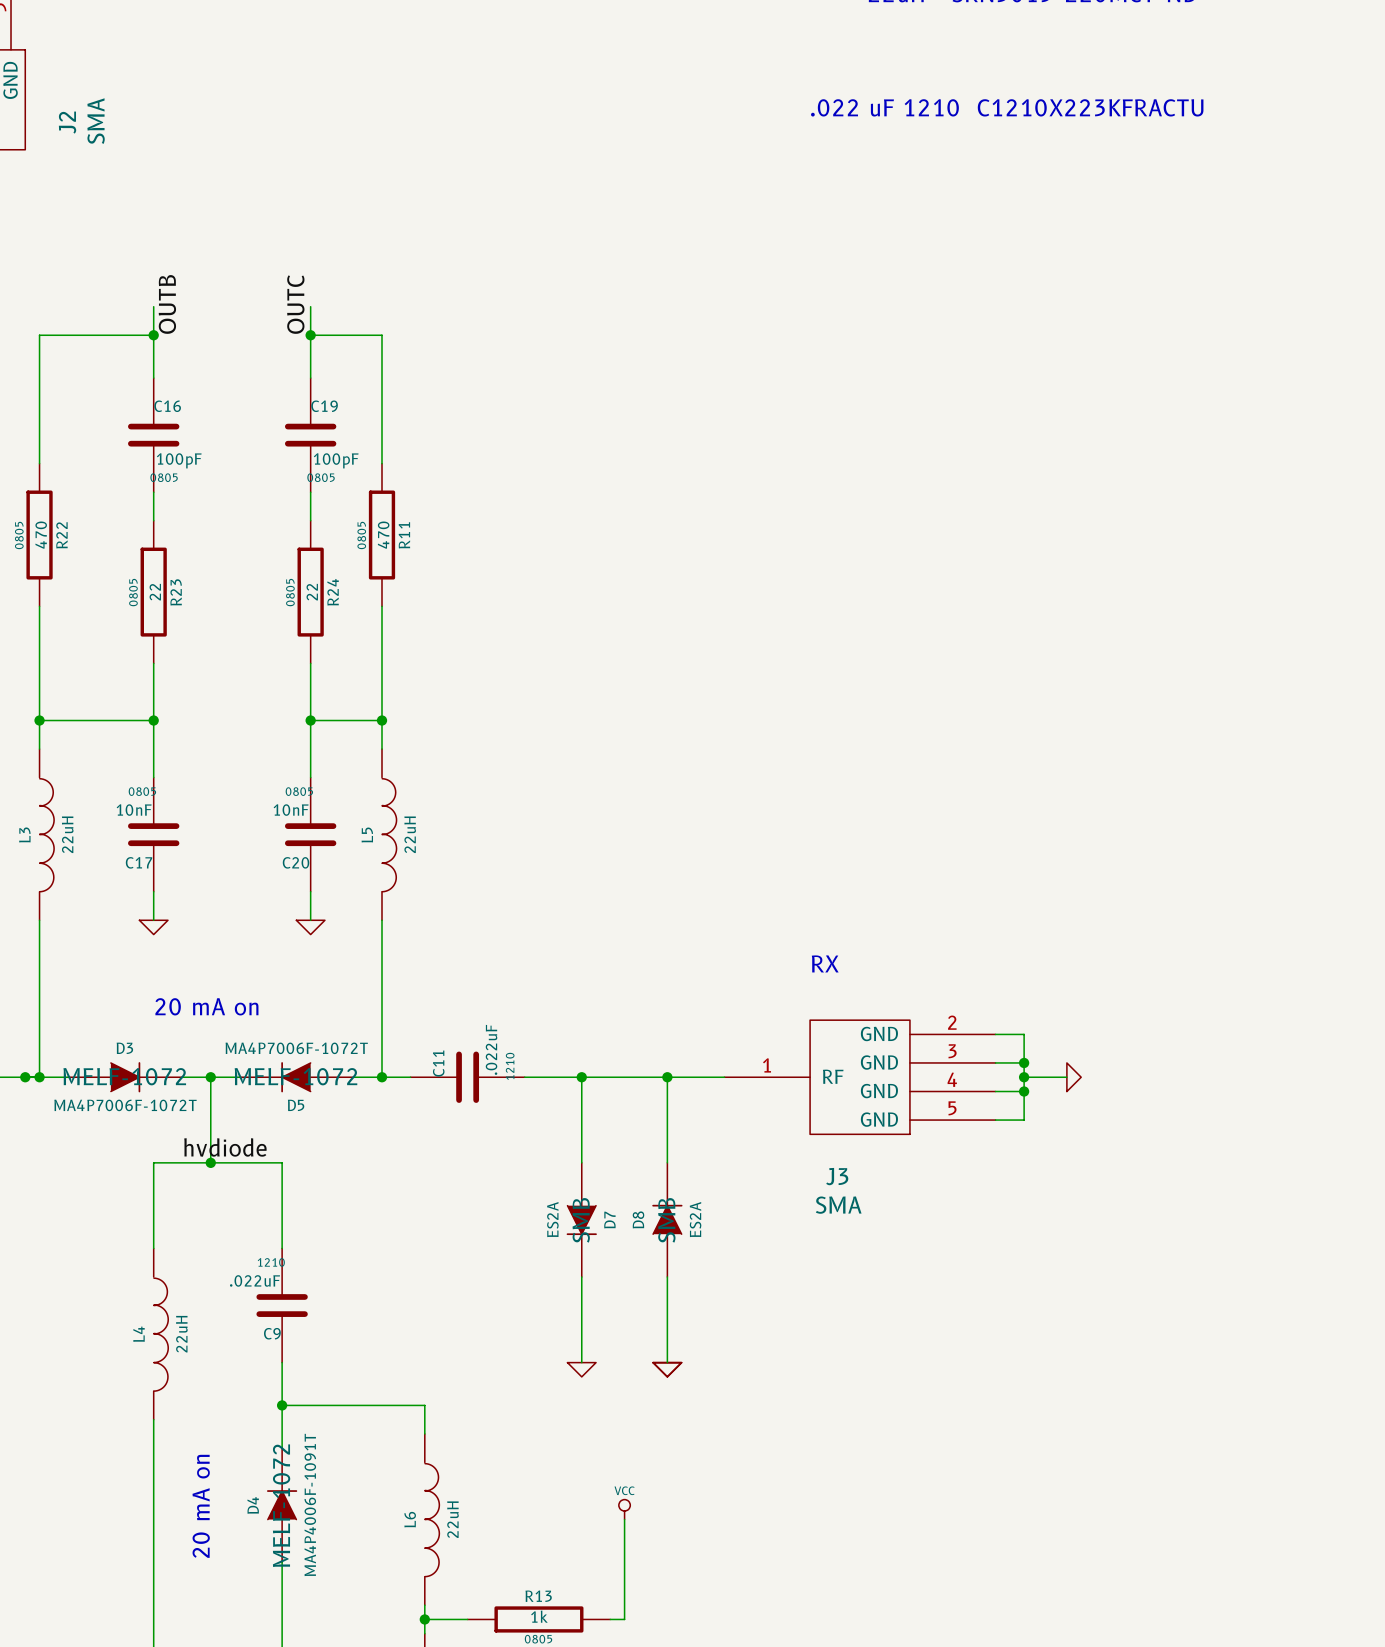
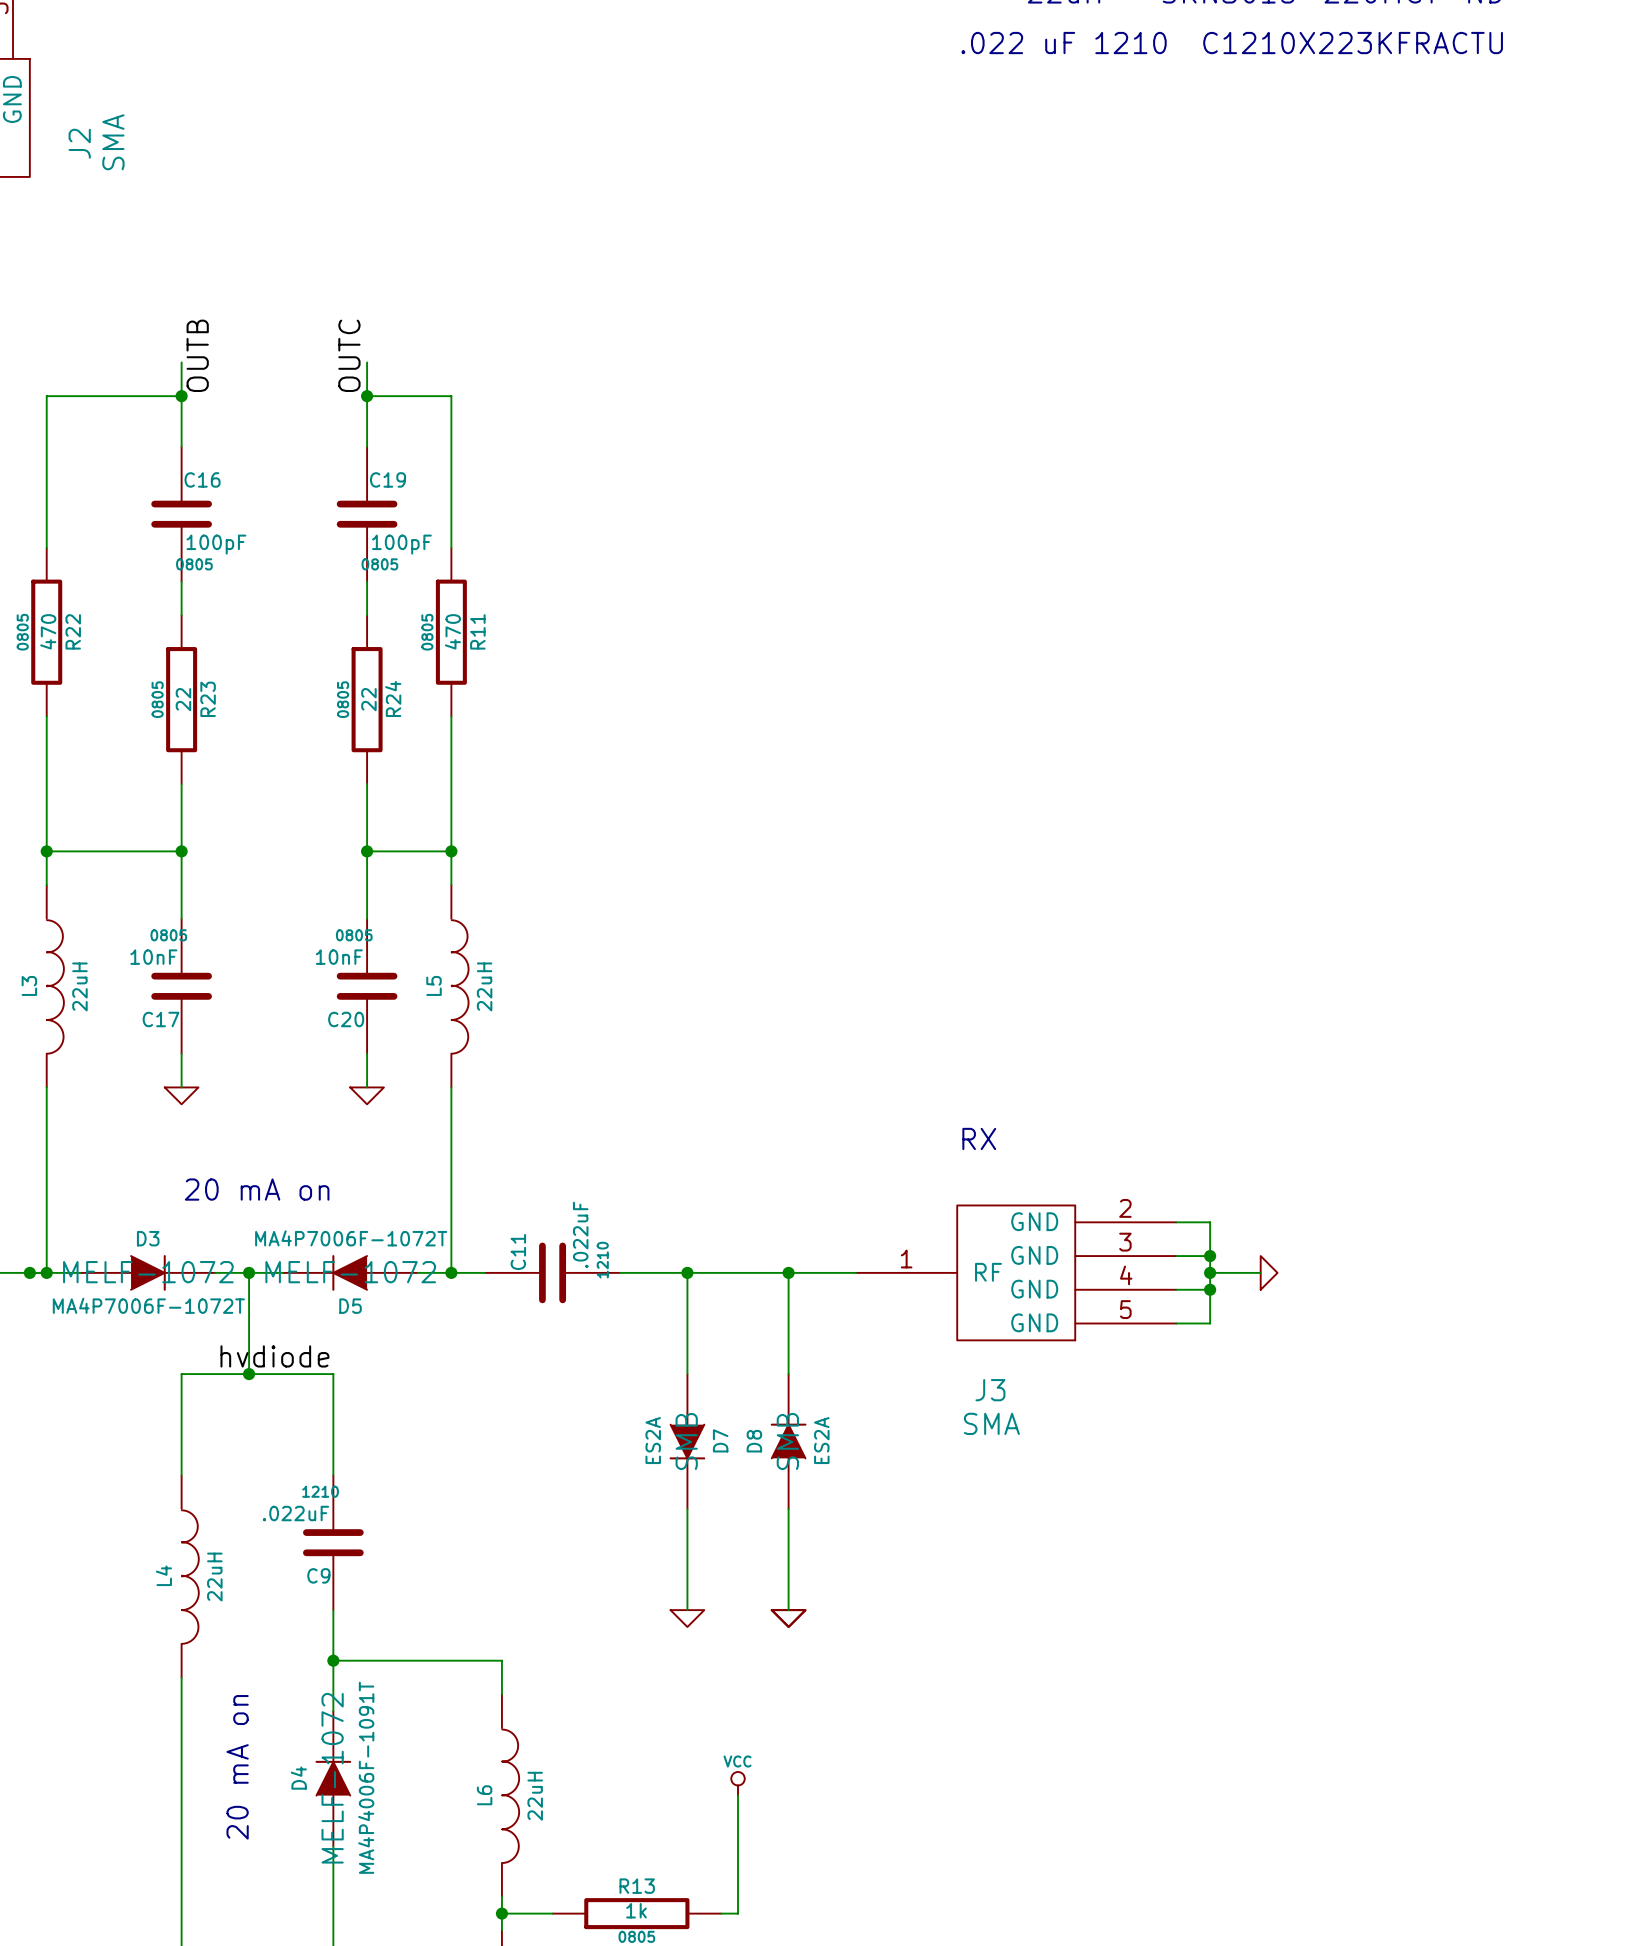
text position: .022 uF 1210 C1210X223KFRACTU (1007, 107) -> .022 uF 1210 C1210X223KFRACTU (1232, 43)

